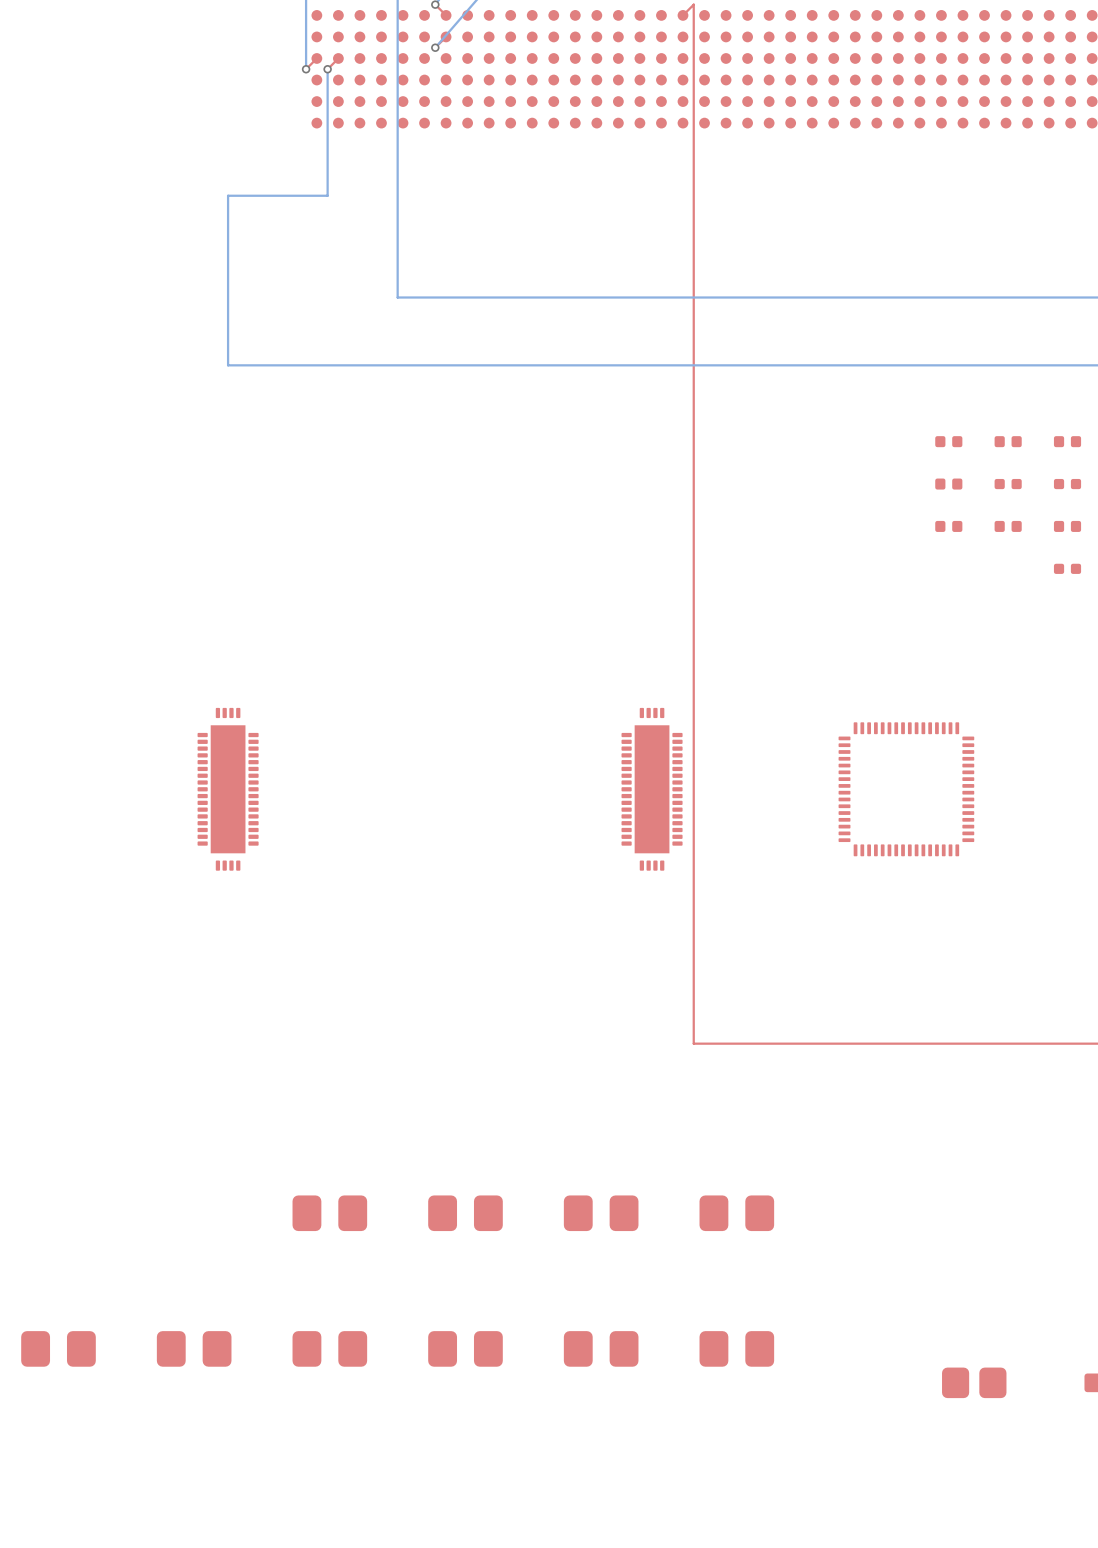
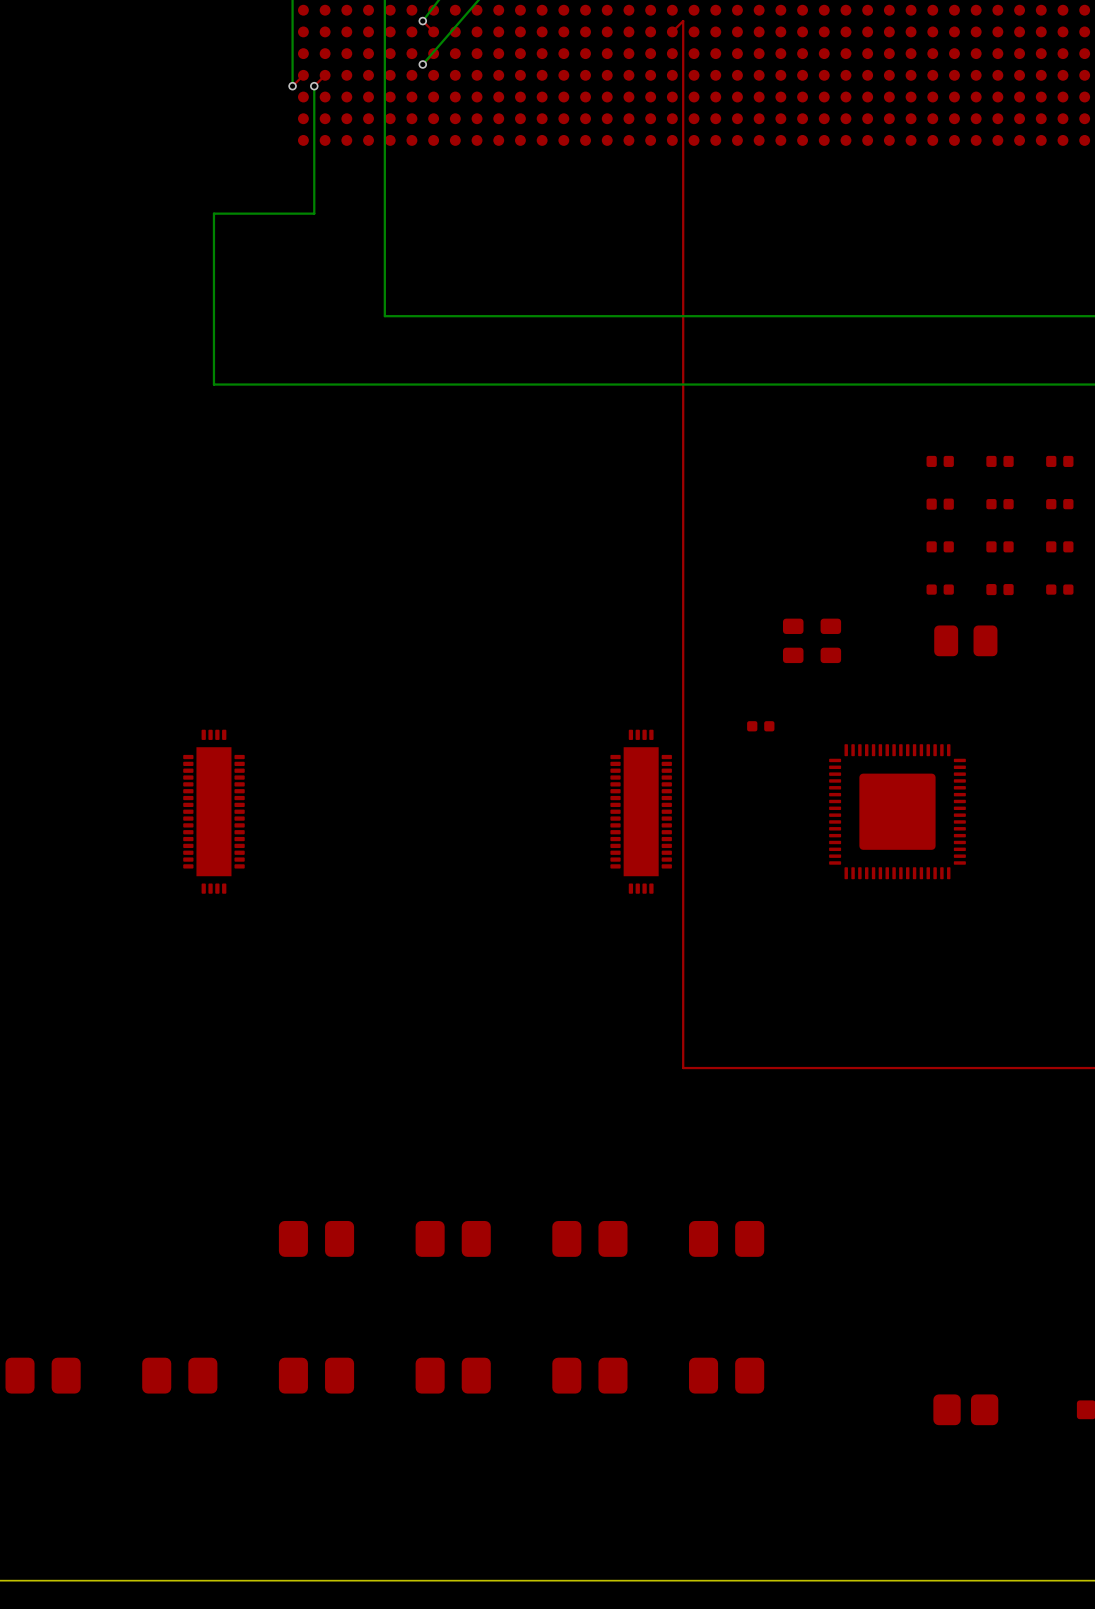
part: none -> (940, 589)
part: none -> (1000, 589)
part: none -> (812, 640)
part: none -> (965, 640)
part: none -> (760, 726)
part footprint: [838, 722, 975, 857] -> [829, 744, 966, 880]

